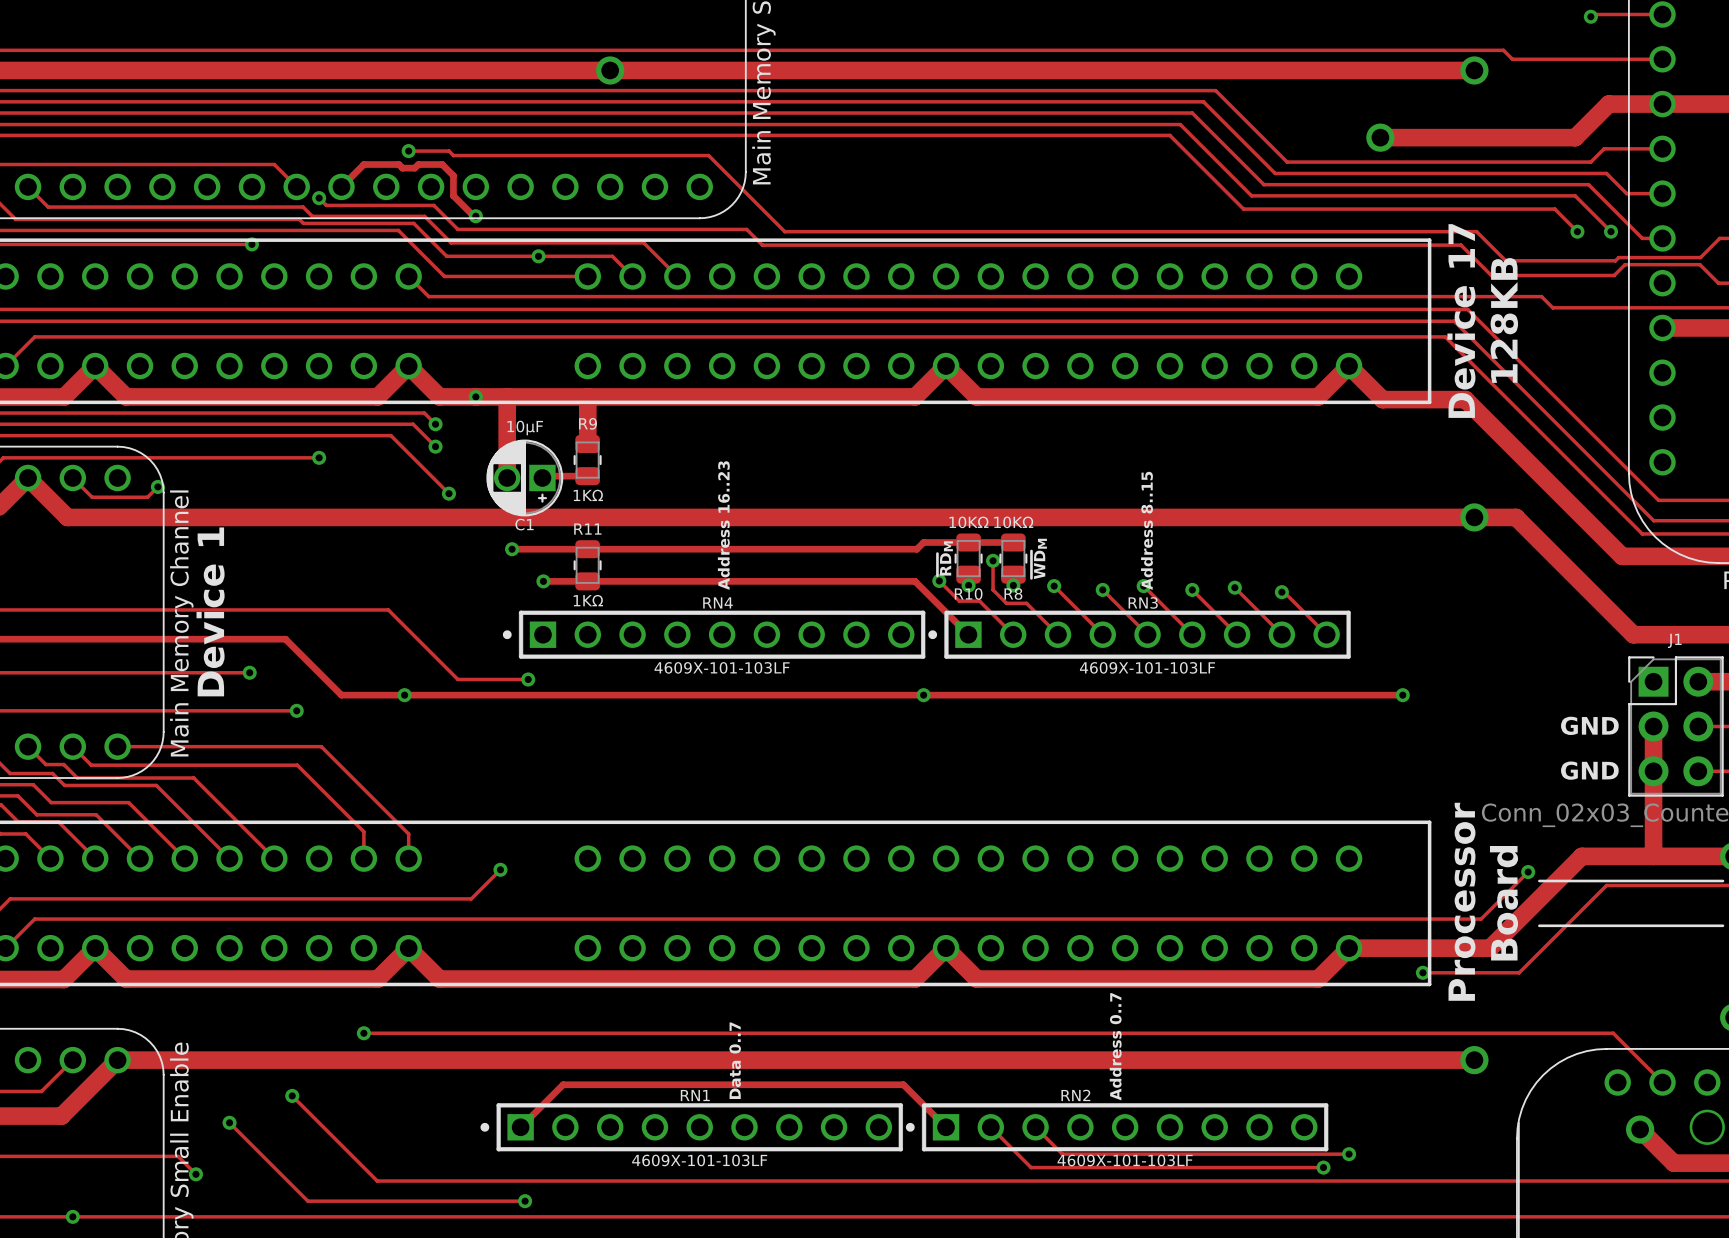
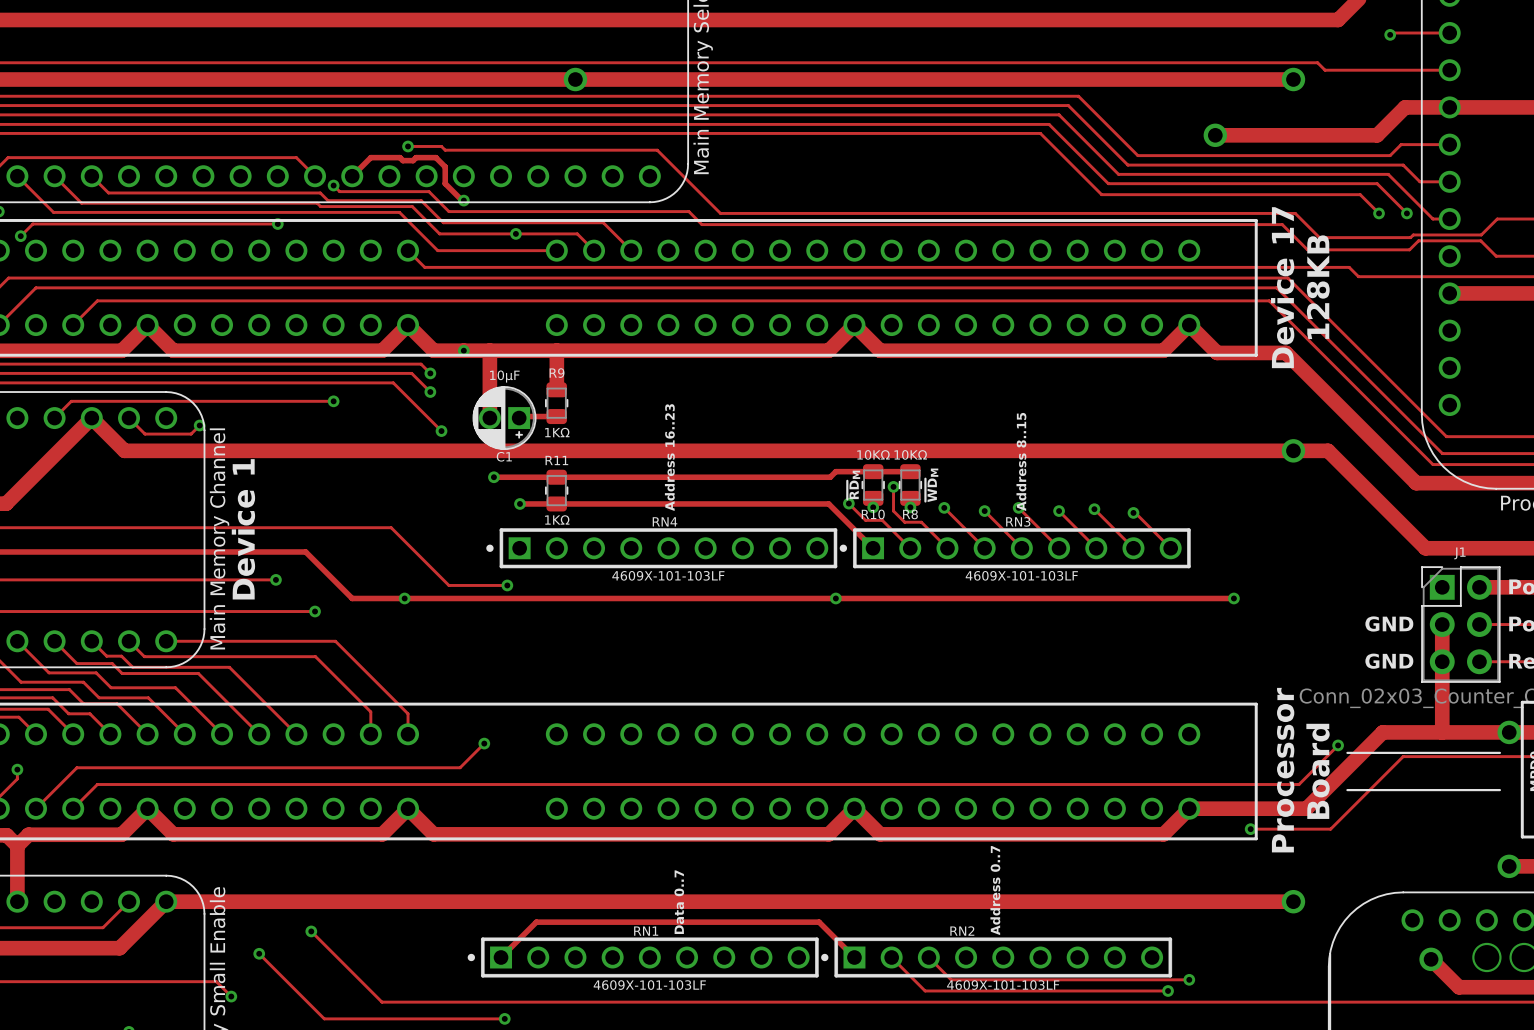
track: (363, 1033) (1613, 1033) (1662, 1082) -> none
via: (363, 1033) -> none

